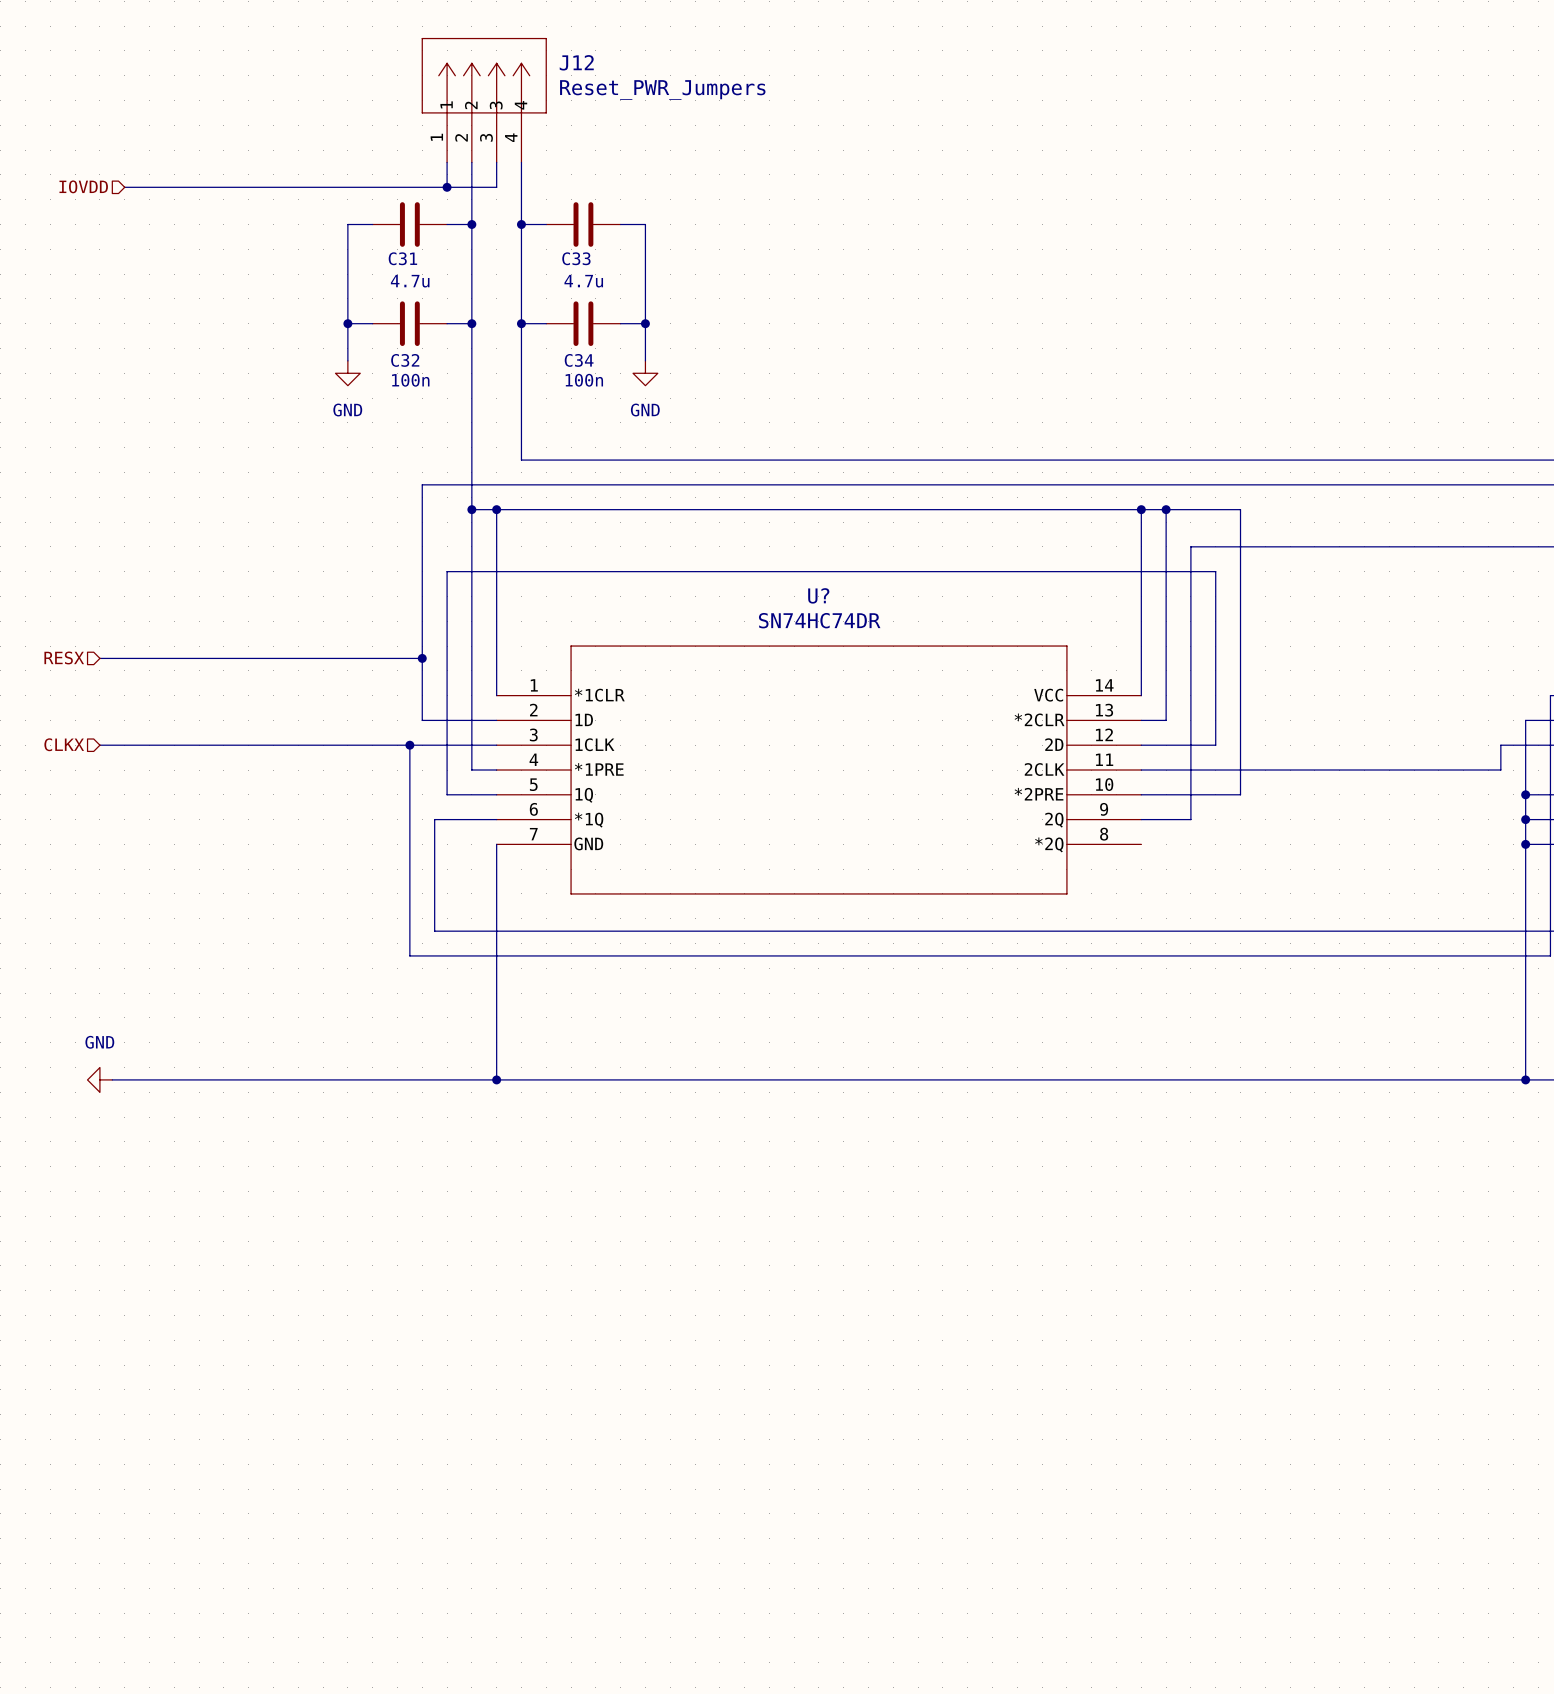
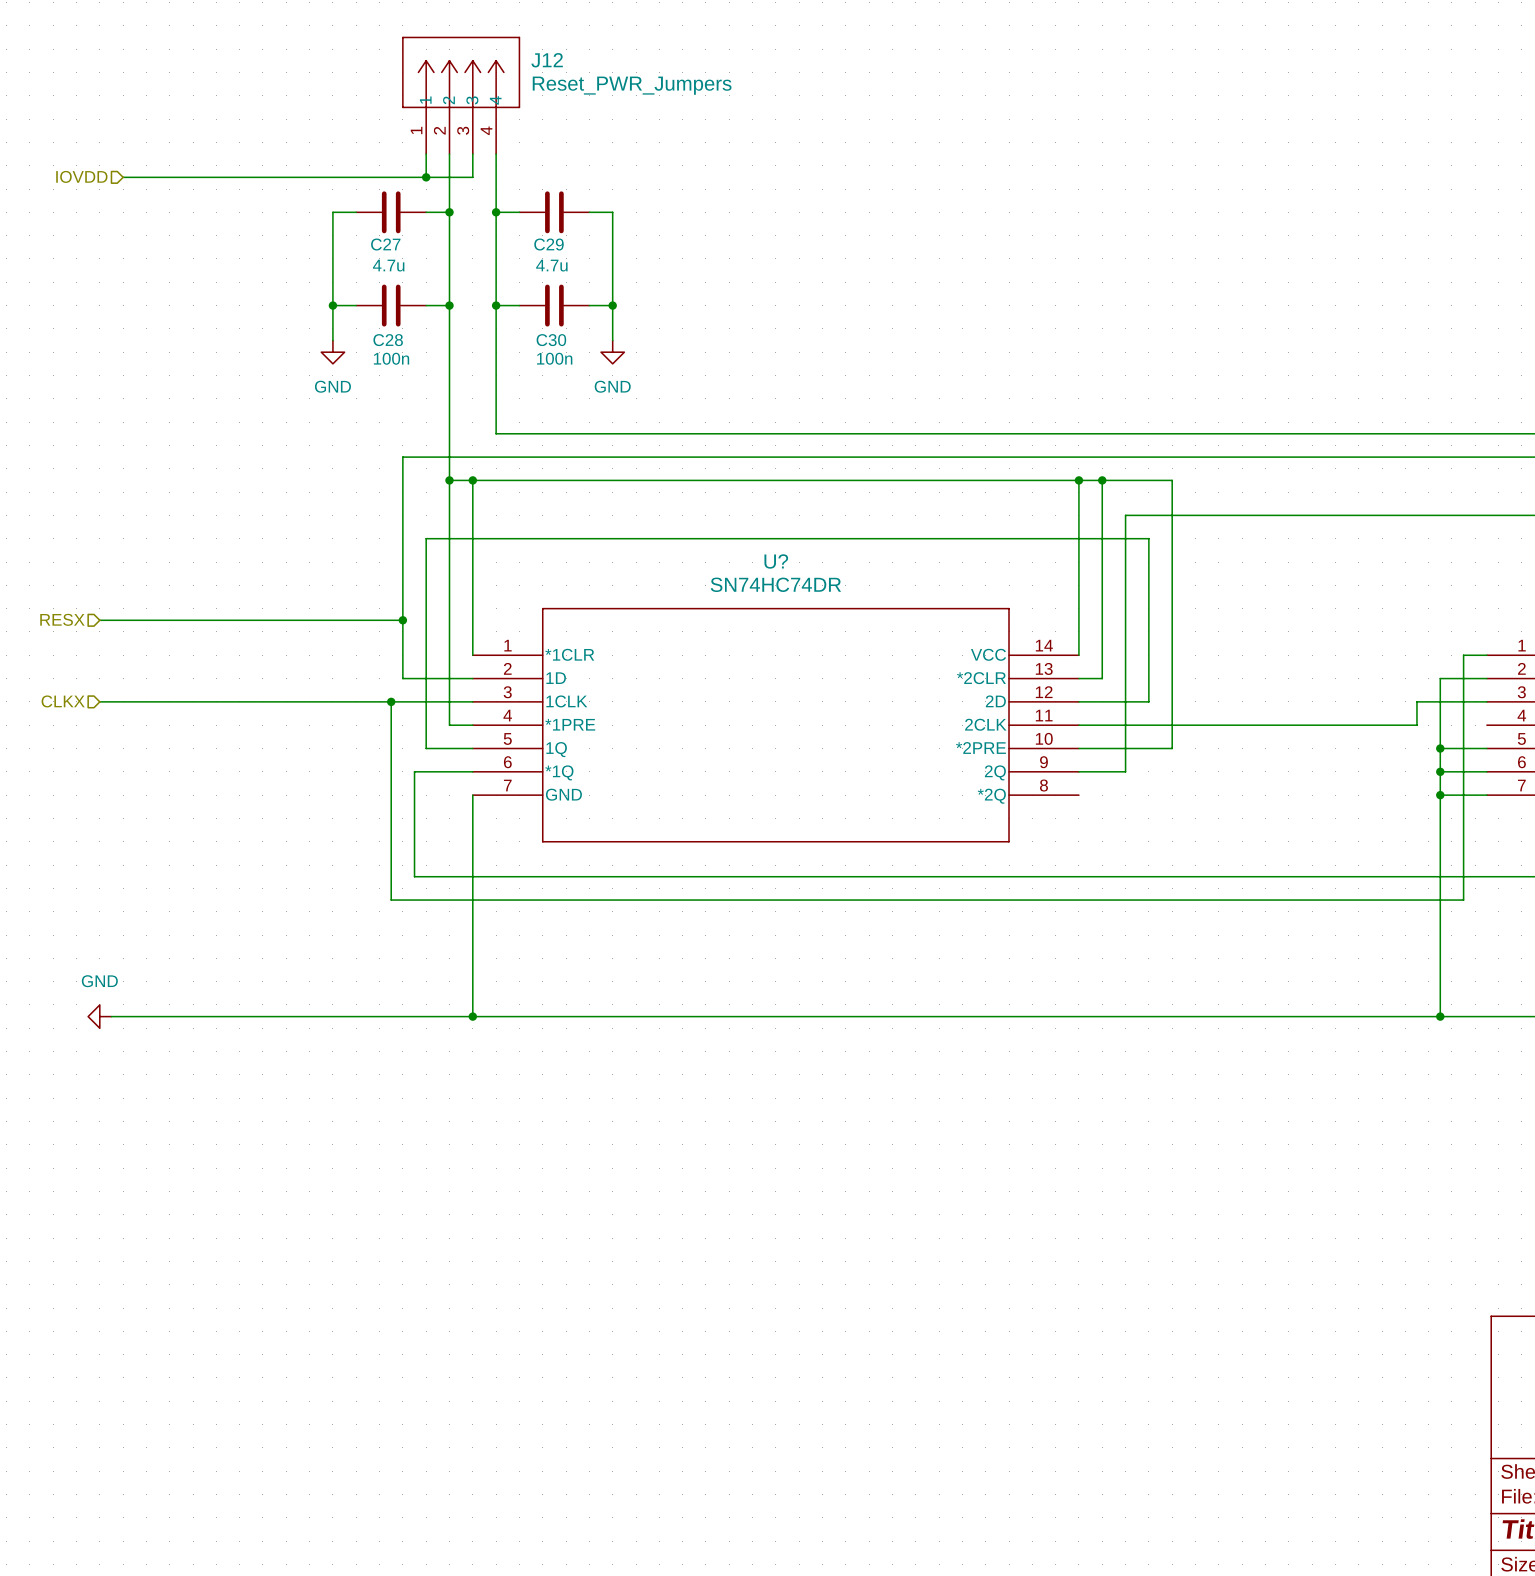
C31 name: C31 (402, 258) -> C27 (385, 244)
C33 name: C33 (576, 258) -> C29 (548, 244)
C32 name: C32 (405, 360) -> C28 (388, 340)
C34 name: C34 (579, 360) -> C30 (551, 340)

